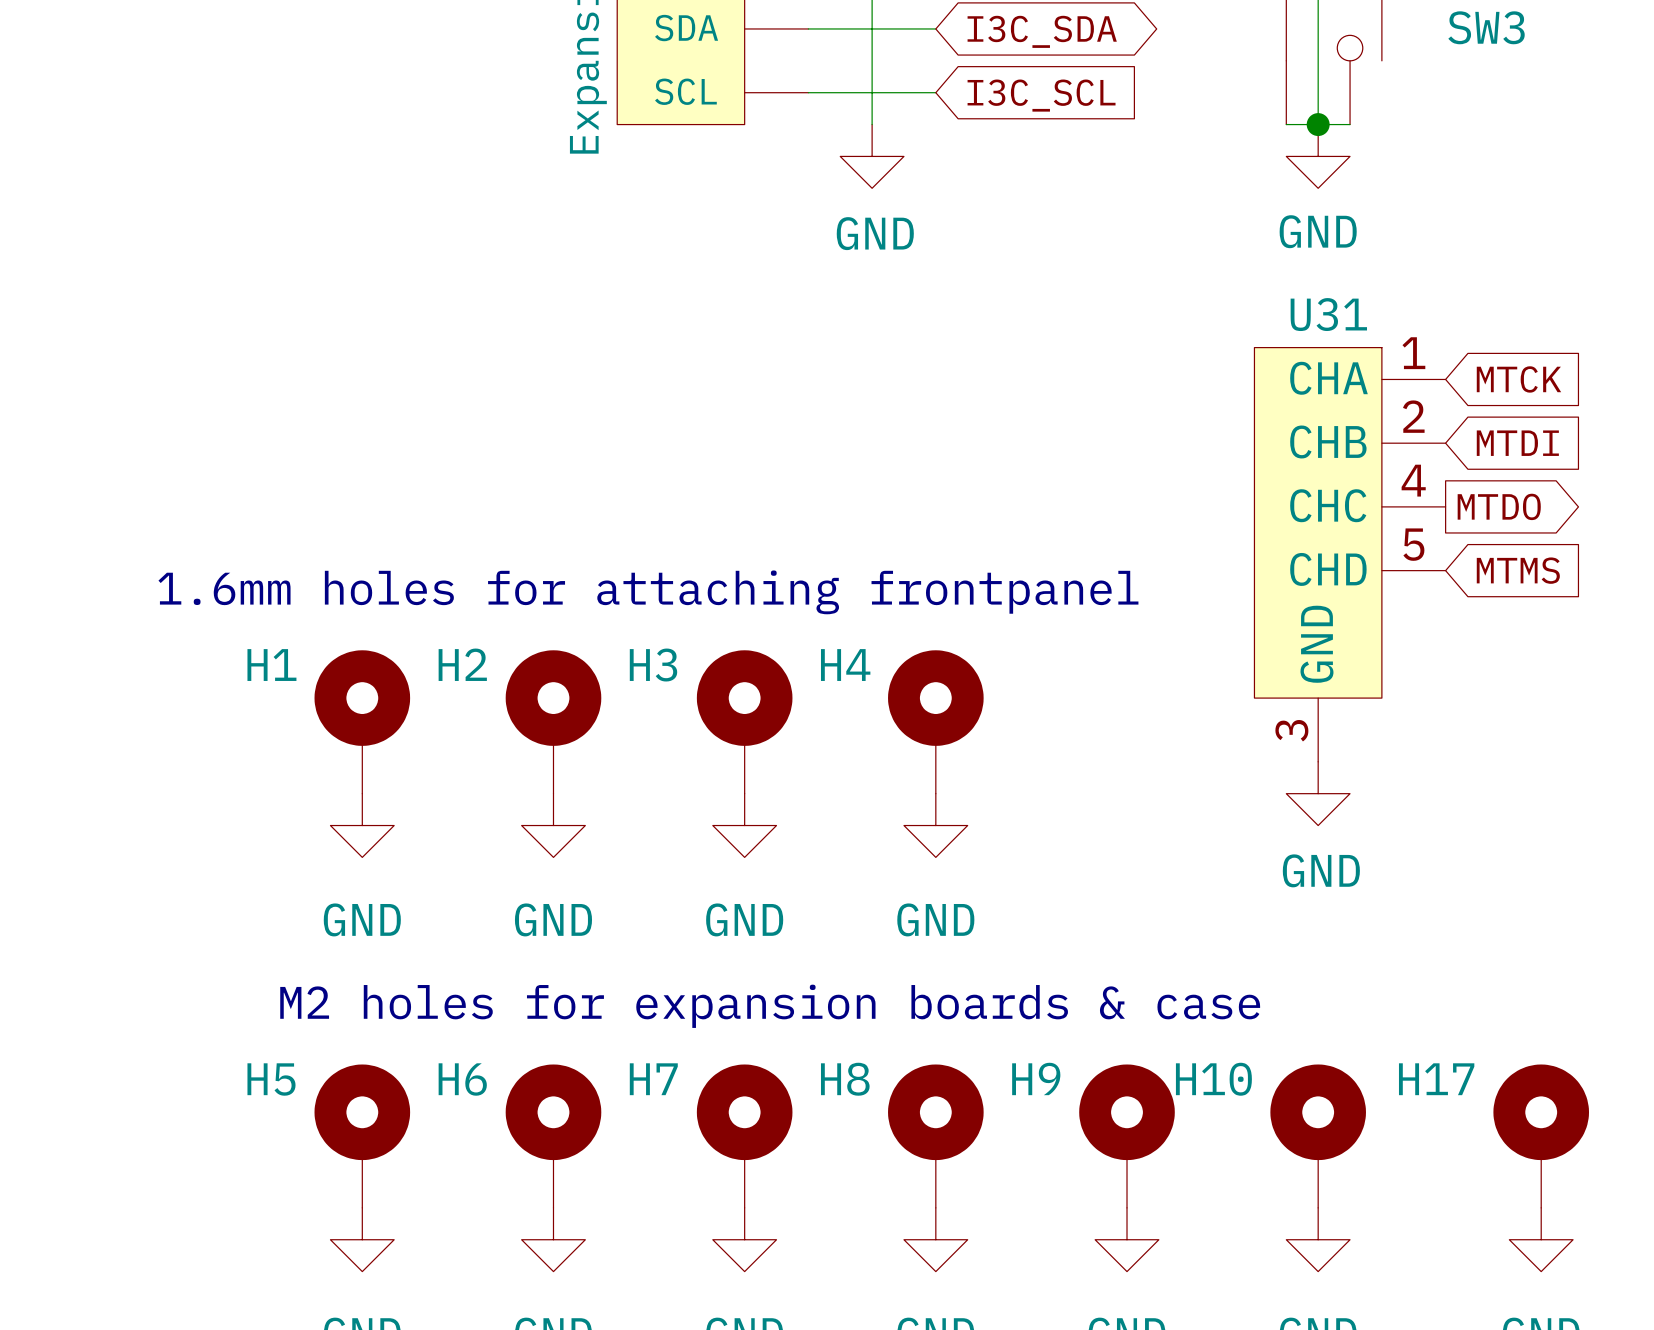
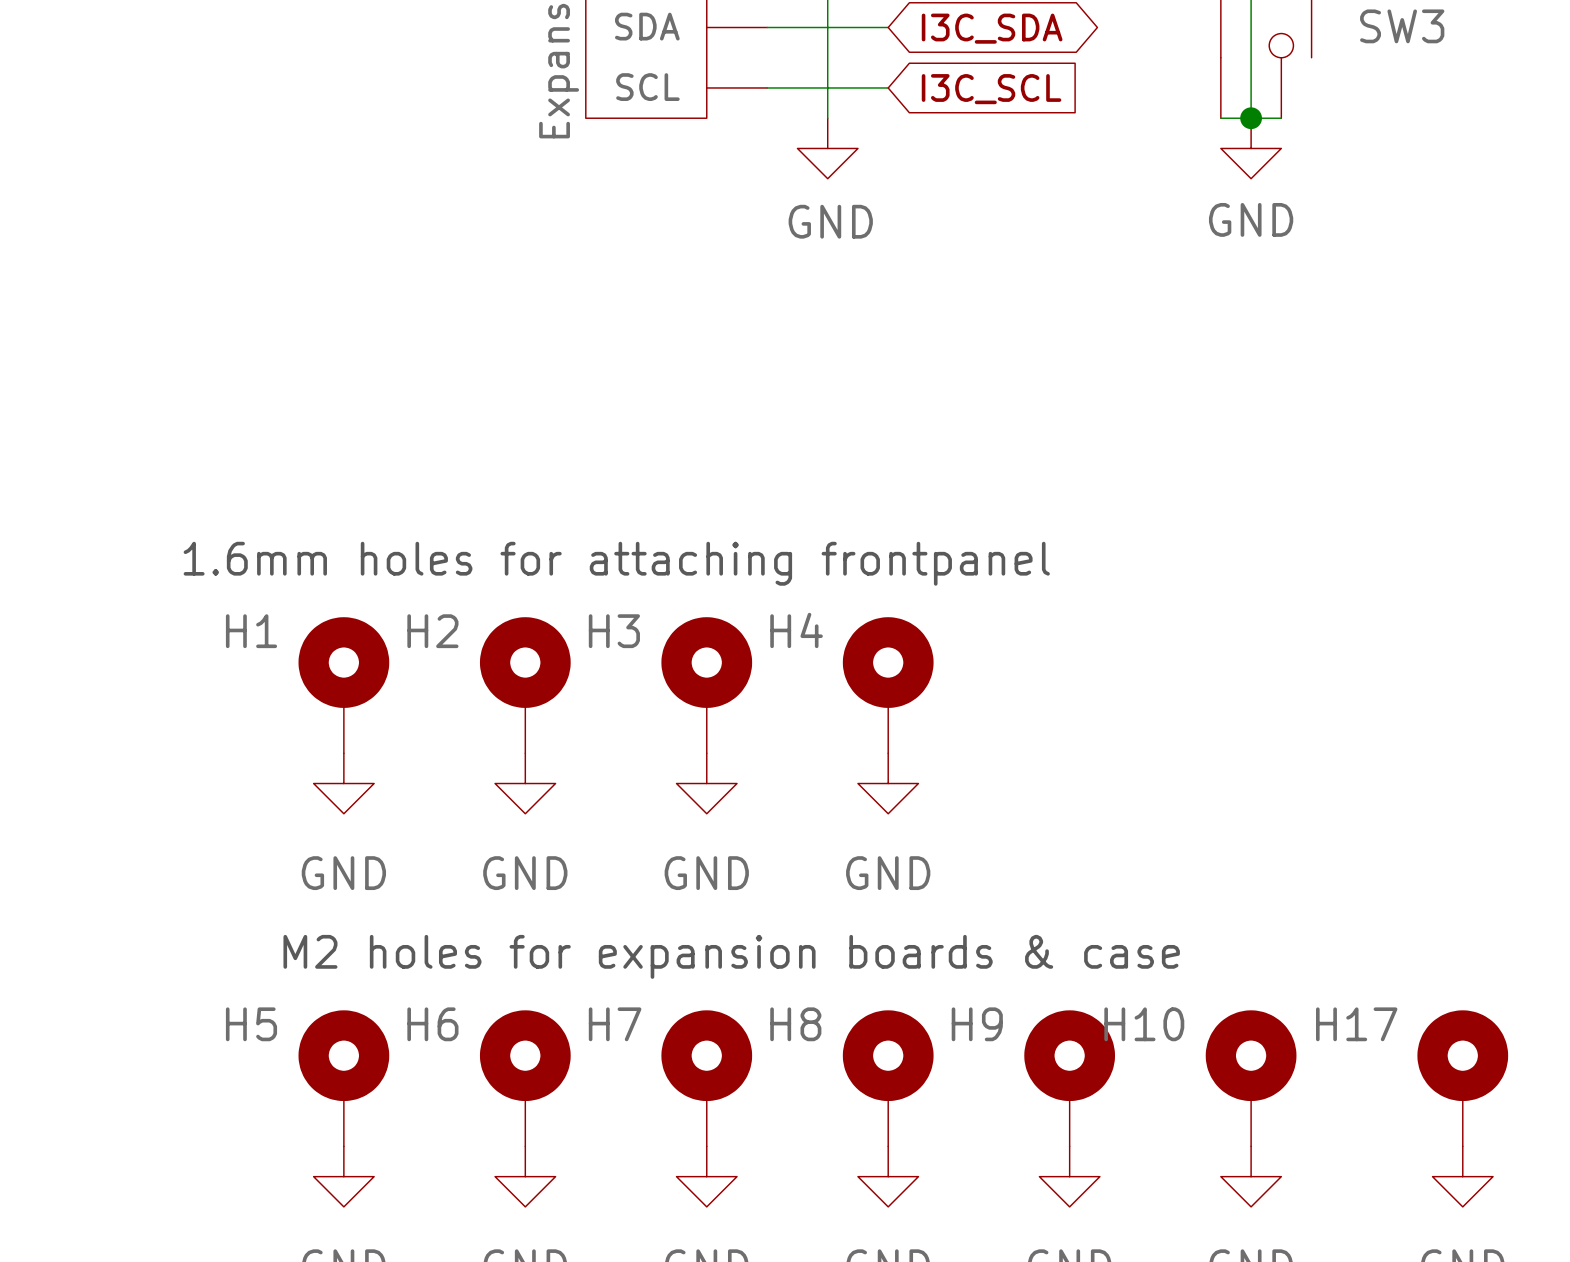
global label: MTCK (1518, 379) -> none
global label: MTDI (1517, 443) -> none
global label: MTDO (1499, 506) -> none
U31: (1350, 554) -> none
global label: MTMS (1518, 570) -> none
power symbol: GND (1318, 793) -> none

